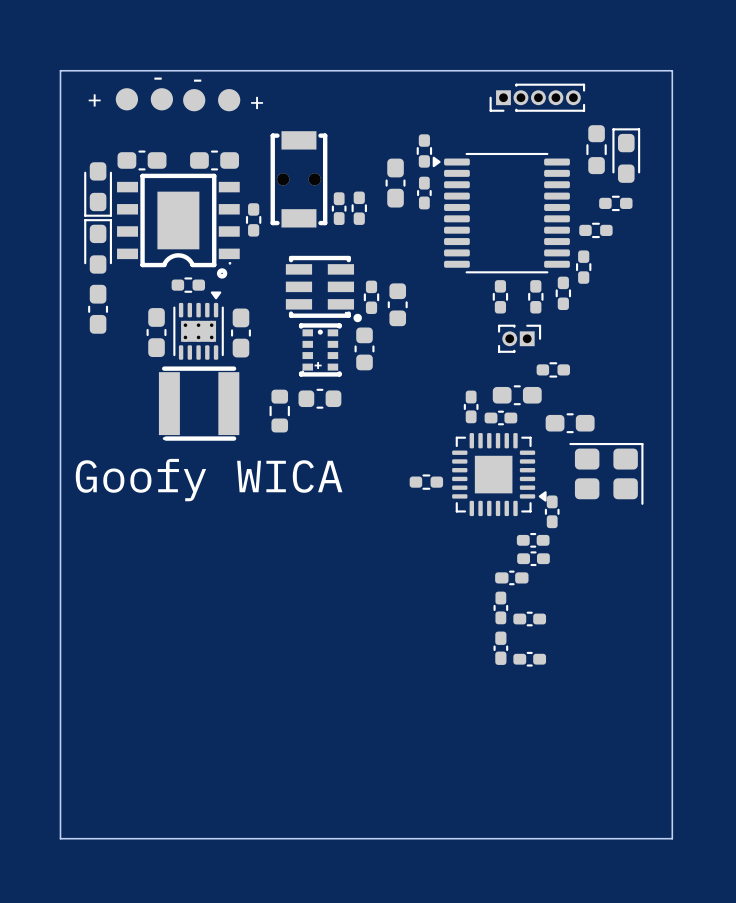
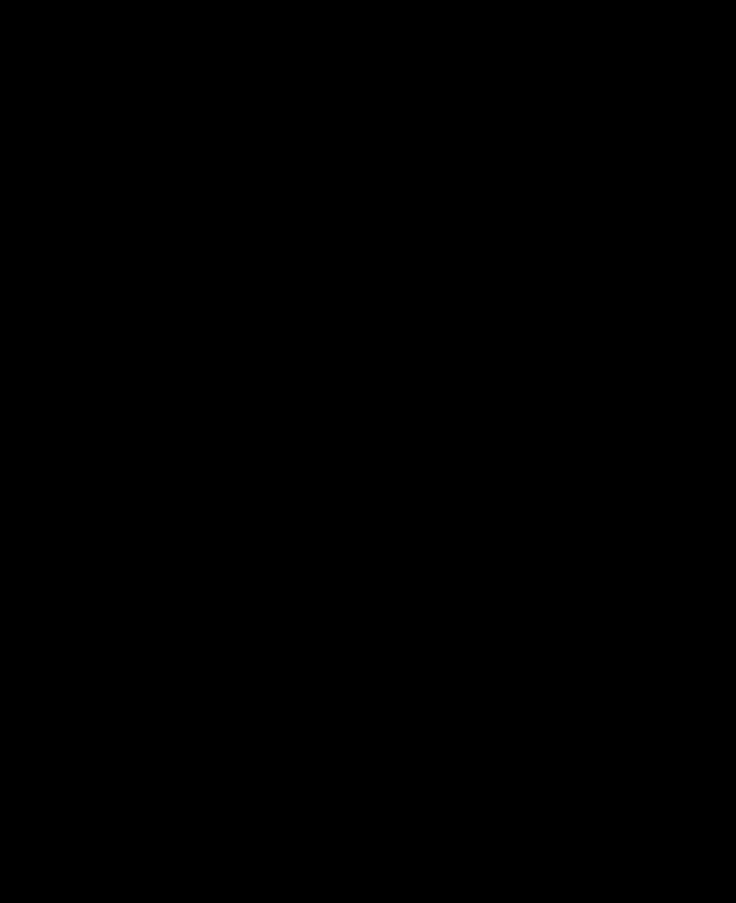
board edge: (60, 70) (672, 70) (672, 838) (60, 838) (60, 70) -> none
part: (537, 97) -> none
part: (144, 99) -> none
part: (211, 100) -> none
part: (596, 149) -> none
part: (424, 150) -> none
part: (626, 155) -> none
part: (141, 160) -> none
part: (214, 160) -> none
part: (298, 179) -> none
part: (395, 183) -> none
part: (98, 189) -> none
part: (424, 193) -> none
part: (615, 203) -> none
part: (339, 208) -> none
part: (359, 208) -> none
part: (501, 213) -> none
part: (253, 219) -> none
part: (178, 226) -> none
part: (595, 230) -> none
part: (98, 246) -> none
part: (583, 267) -> none
part: (188, 285) -> none
part: (323, 289) -> none
part: (563, 293) -> none
part: (500, 296) -> none
part: (535, 296) -> none
part: (371, 297) -> none
part: (397, 304) -> none
part: (98, 309) -> none
part: (198, 325) -> none
part: (156, 332) -> none
part: (240, 333) -> none
part: (519, 338) -> none
part: (364, 348) -> none
part: (320, 349) -> none
part: (553, 369) -> none
part: (517, 395) -> none
part: (319, 398) -> none
part: (199, 403) -> none
part: (471, 406) -> none
part: (279, 411) -> none
part: (500, 417) -> none
part: (570, 423) -> none
part: (606, 473) -> none
part: (499, 474) -> none
text: Goofy WICA (209, 480) -> none
part: (426, 482) -> none
part: (552, 511) -> none
part: (533, 540) -> none
part: (533, 558) -> none
part: (511, 577) -> none
part: (500, 607) -> none
part: (529, 619) -> none
part: (500, 648) -> none
part: (529, 659) -> none

